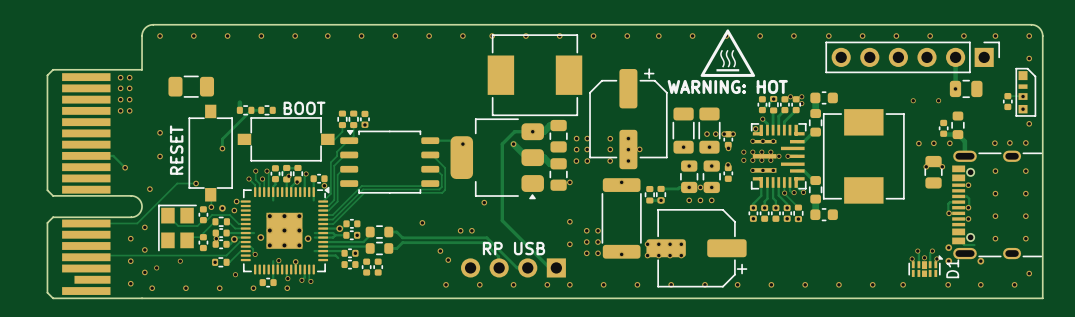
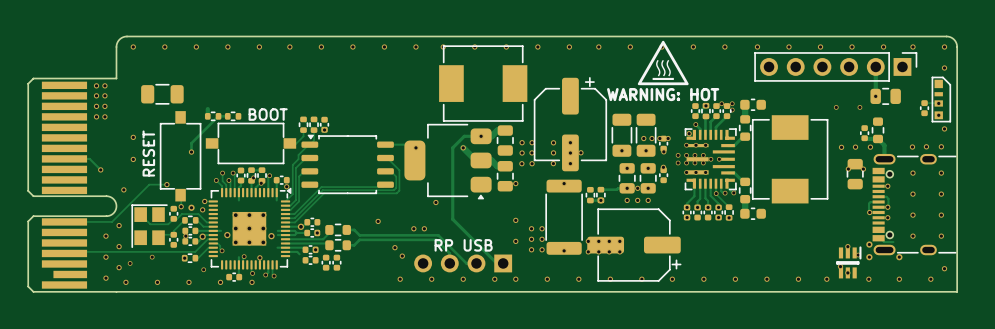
via: none -> (847, 246)
track: (917, 251) (918, 264) -> none
via: (917, 251) -> none
track: (932, 251) (930, 253) (930, 264) -> none
via: (932, 251) -> none
via: (924, 257) -> none
via: (912, 258) -> none
D1: (925, 266) -> none
part: none -> (848, 262)
via: none -> (840, 266)
via: none -> (847, 272)

